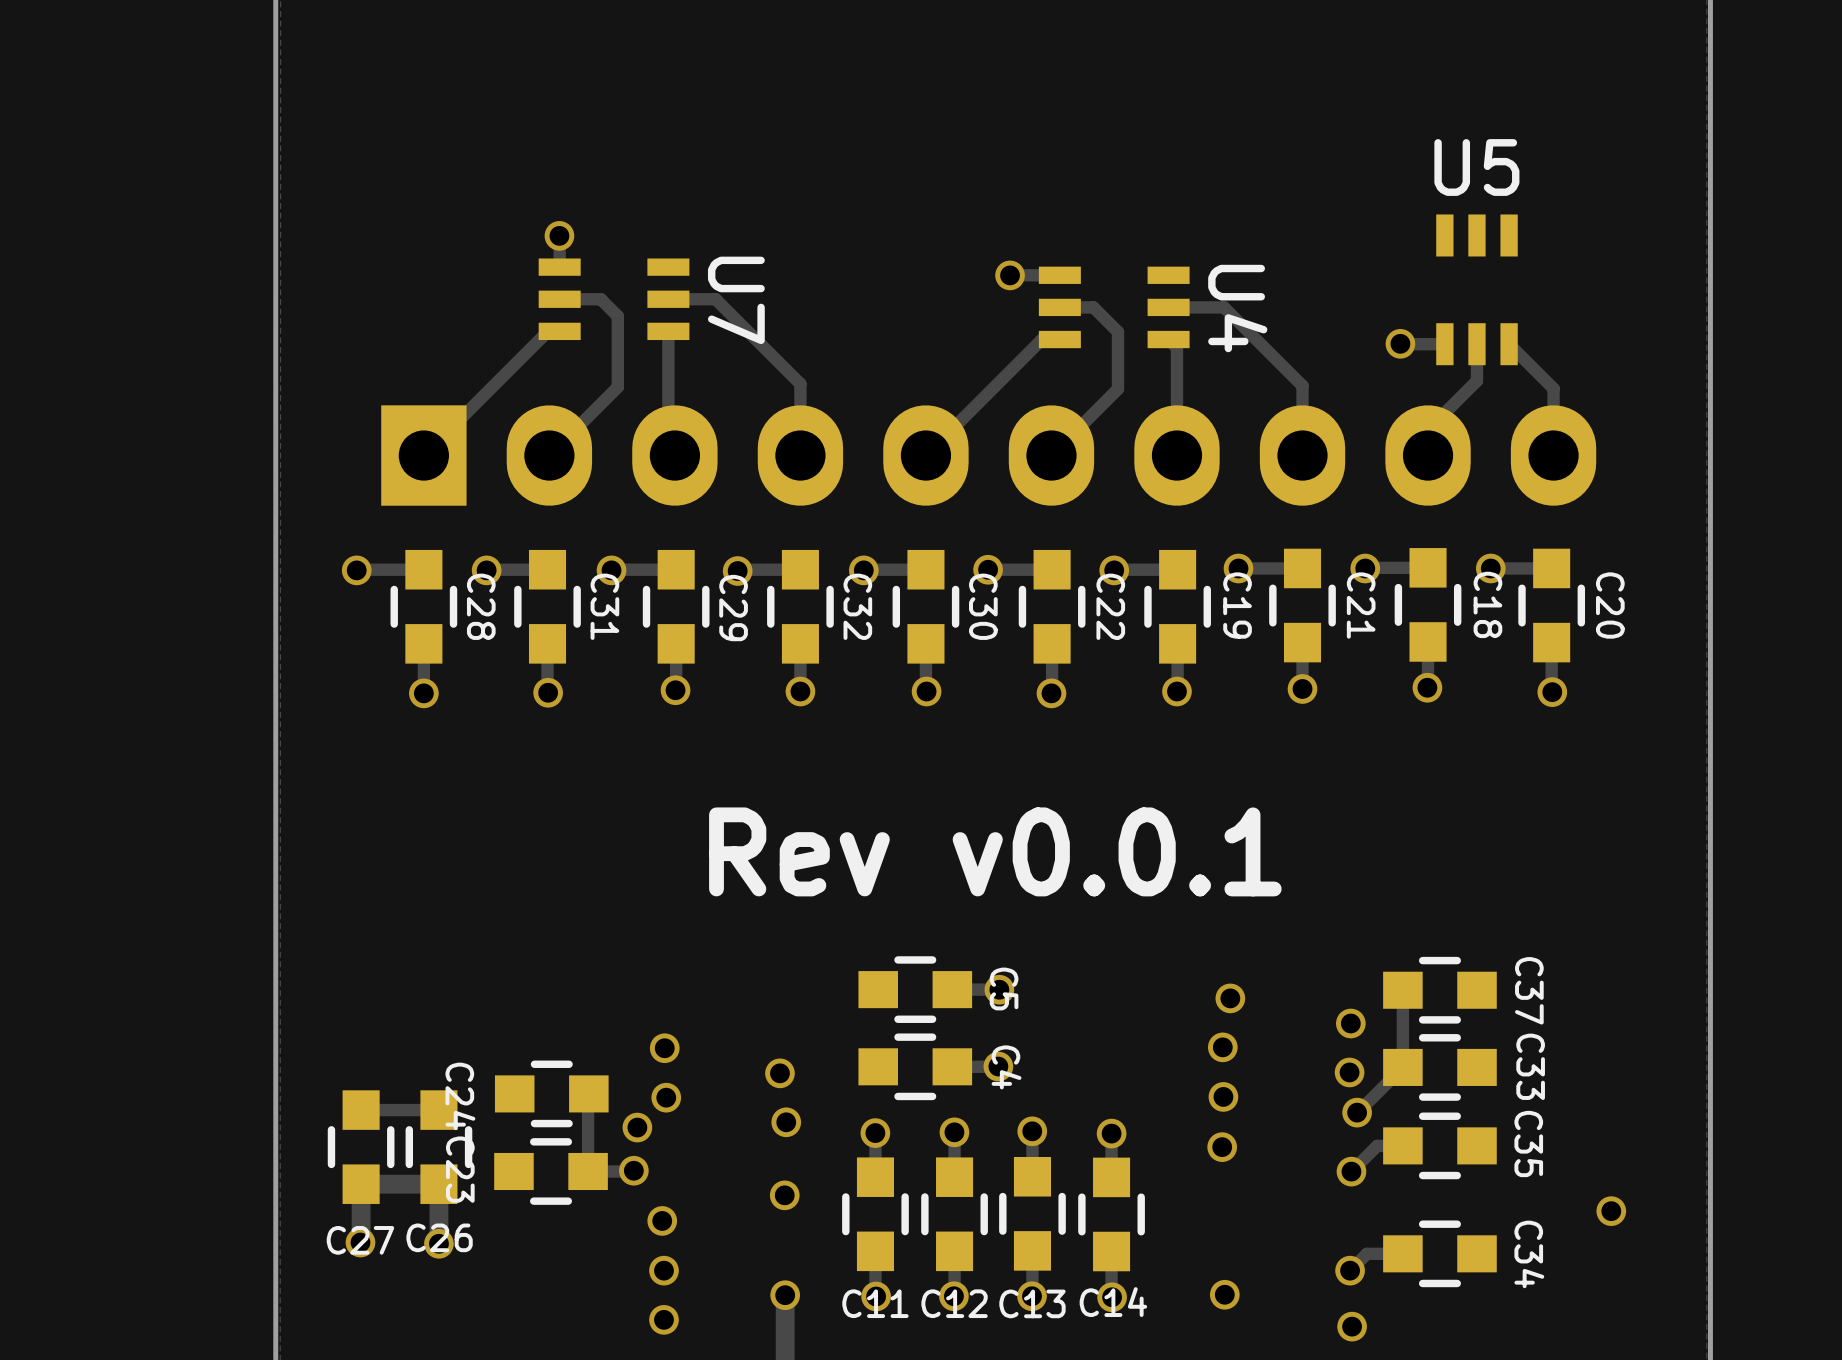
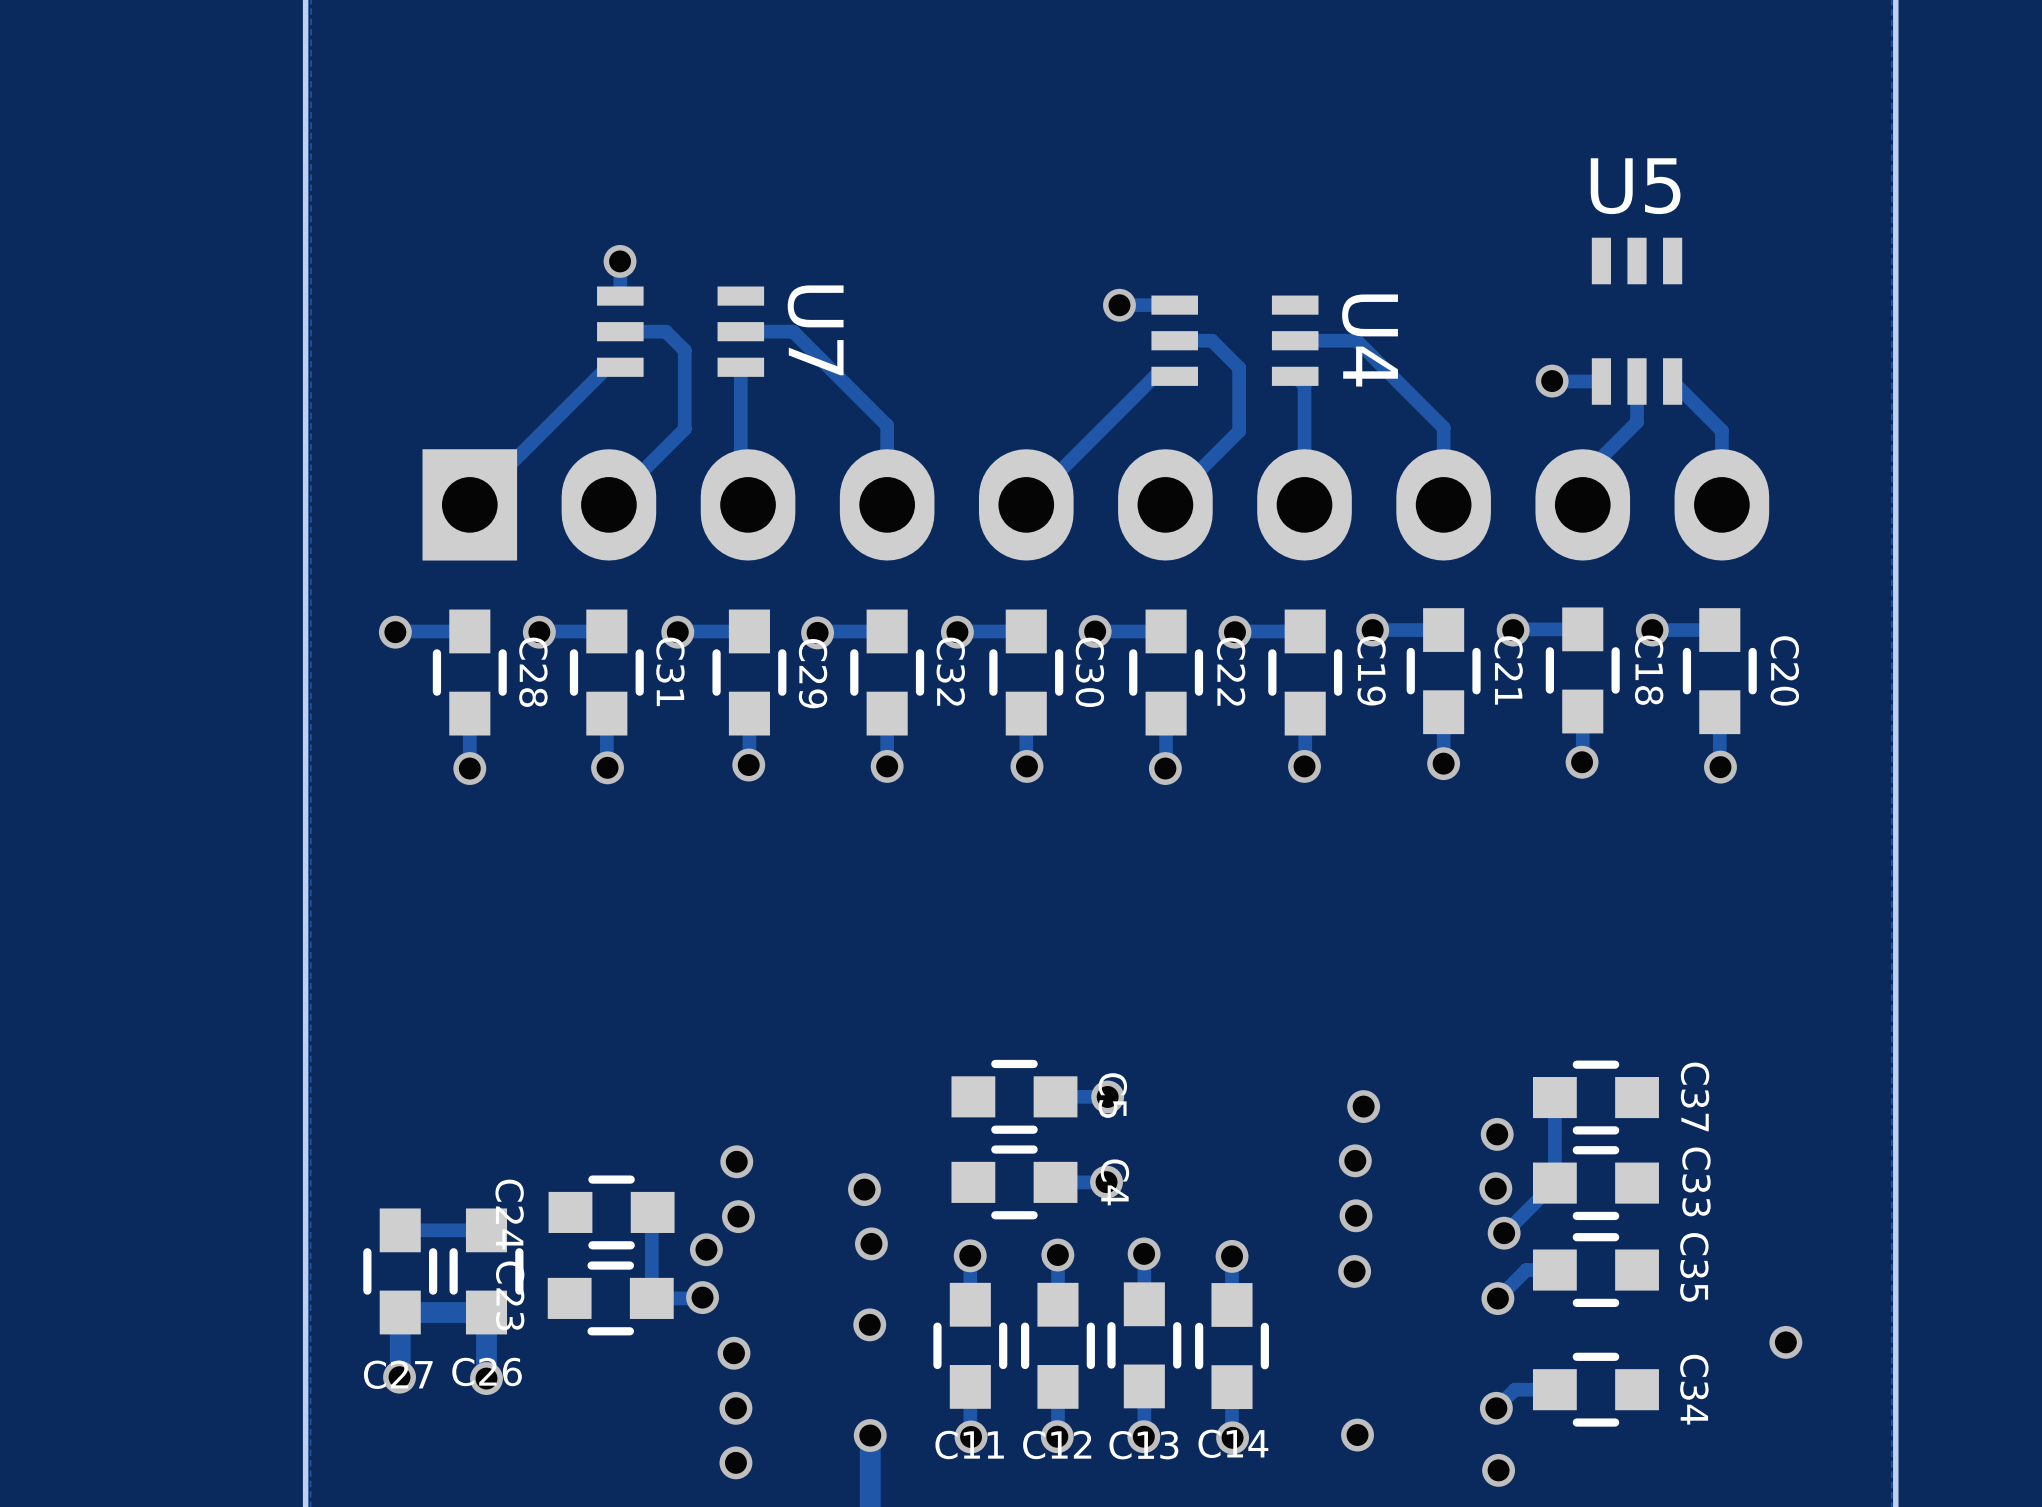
text: Rev v0.0.1 (995, 851) -> none

